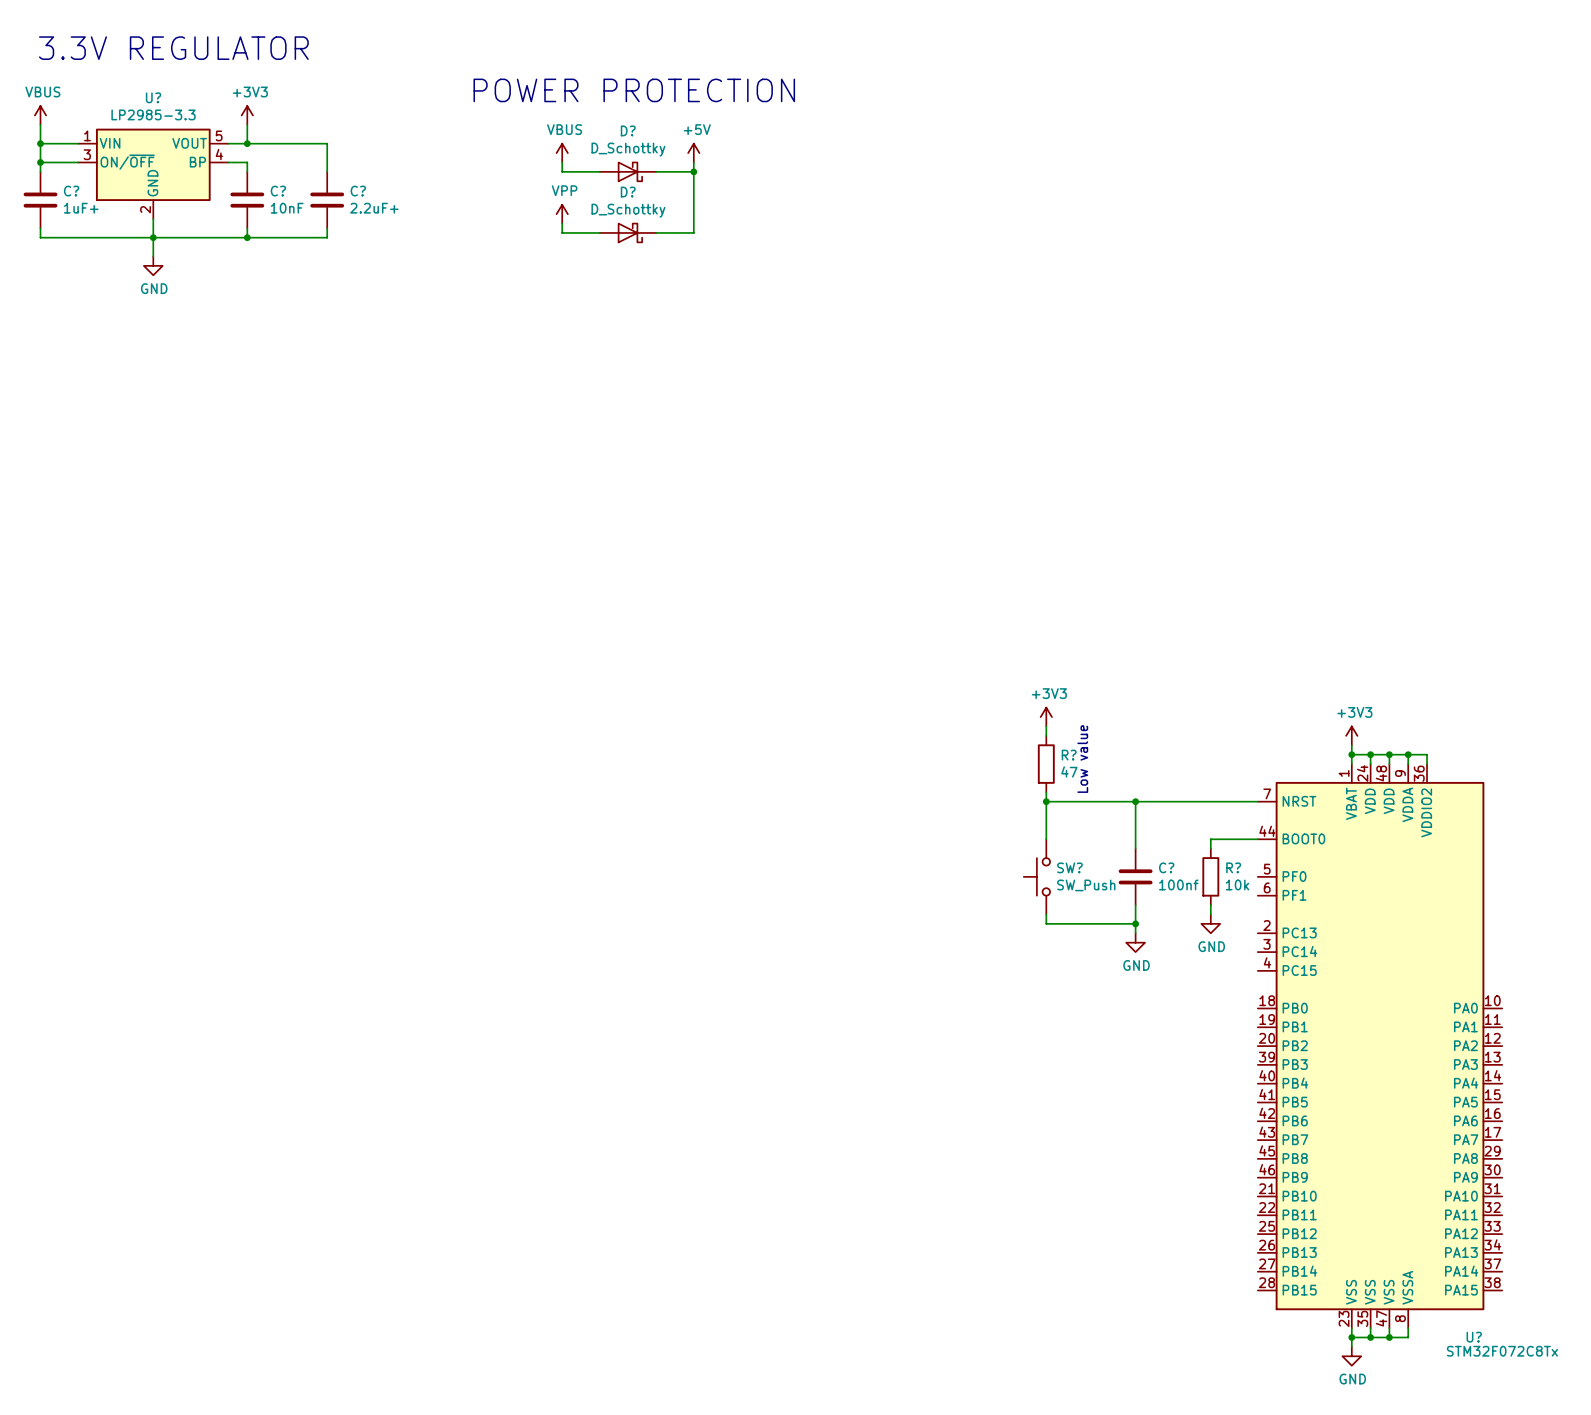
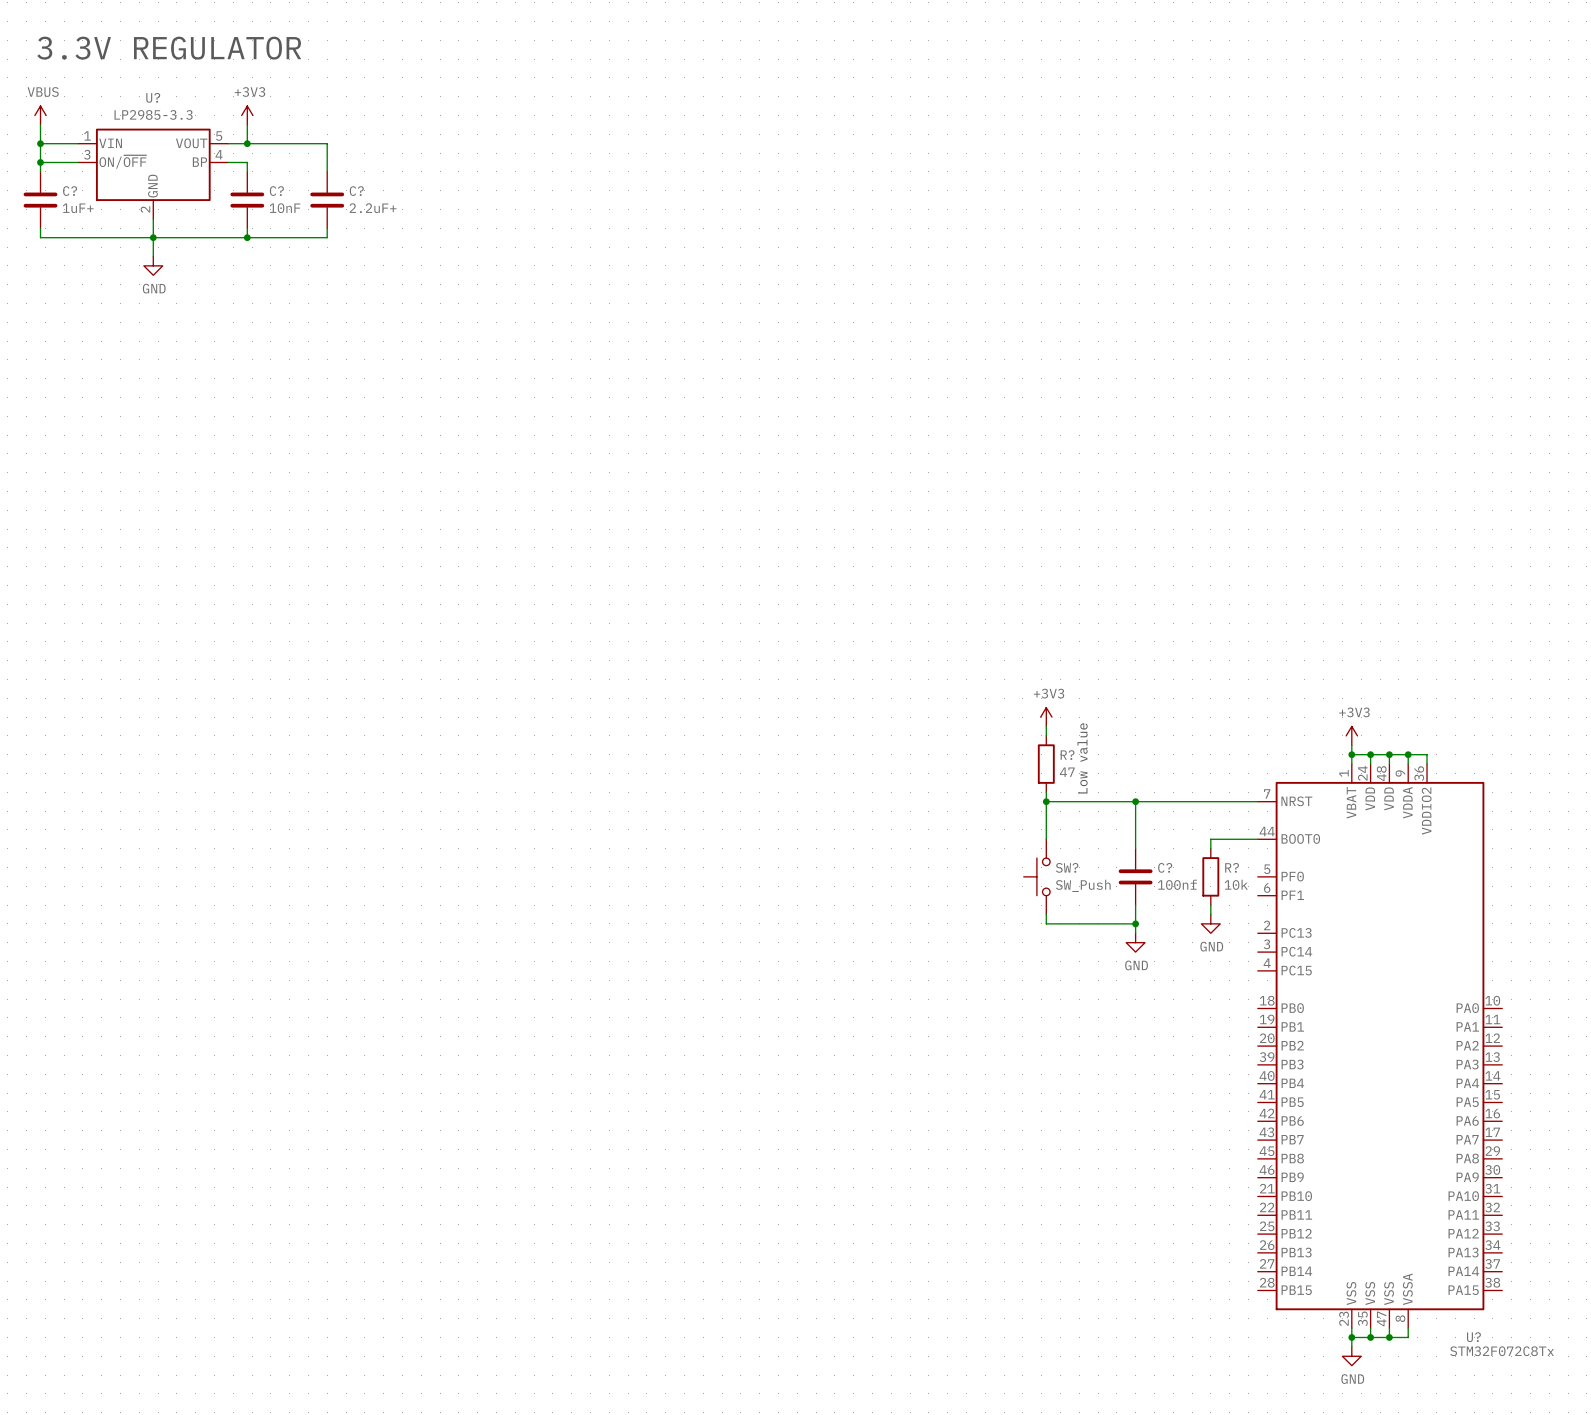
text: POWER PROTECTION (634, 90) -> none
power symbol: VBUS (562, 153) -> none
power symbol: +5V (693, 153) -> none
wire: (562, 162) (562, 171) (599, 171) -> none
wire: (693, 162) (693, 232) (656, 232) -> none
D?: D_Schottky (628, 171) -> none
wire: (656, 171) (693, 171) -> none
junction: (693, 171) -> none
power symbol: VPP (562, 214) -> none
wire: (562, 223) (562, 232) (599, 232) -> none
D?: D_Schottky (628, 232) -> none

